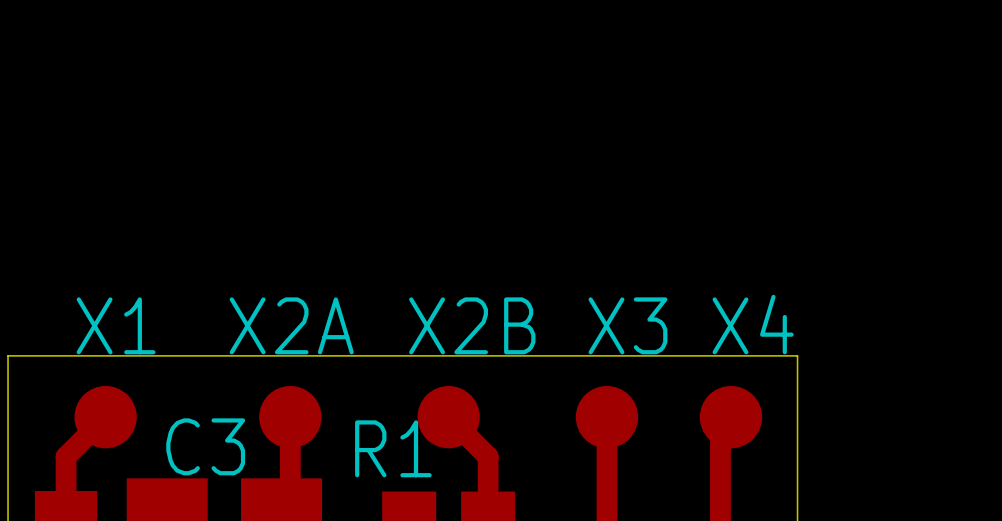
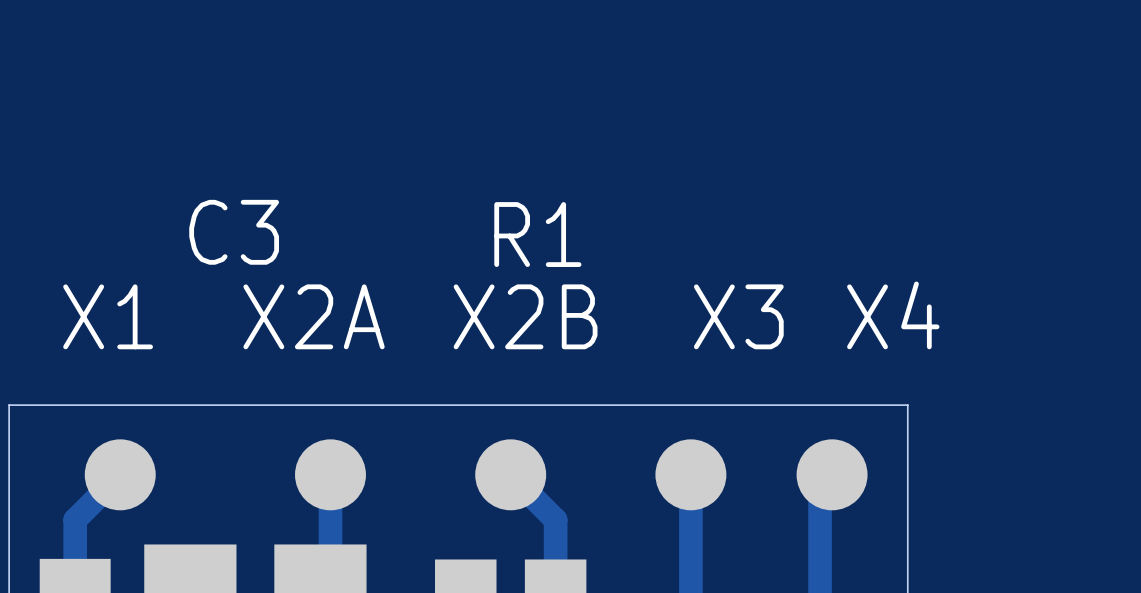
X4 name position: X4 (753, 324) -> X4 (893, 315)
X1 name position: X1 (116, 325) -> X1 (108, 316)
X2A name position: X2A (291, 325) -> X2A (314, 316)
X2B name position: X2B (472, 325) -> X2B (525, 316)
X3 name position: X3 (627, 325) -> X3 (738, 316)
C3 name position: C3 (205, 446) -> C3 (234, 232)
R1 name position: R1 (393, 448) -> R1 (537, 234)

